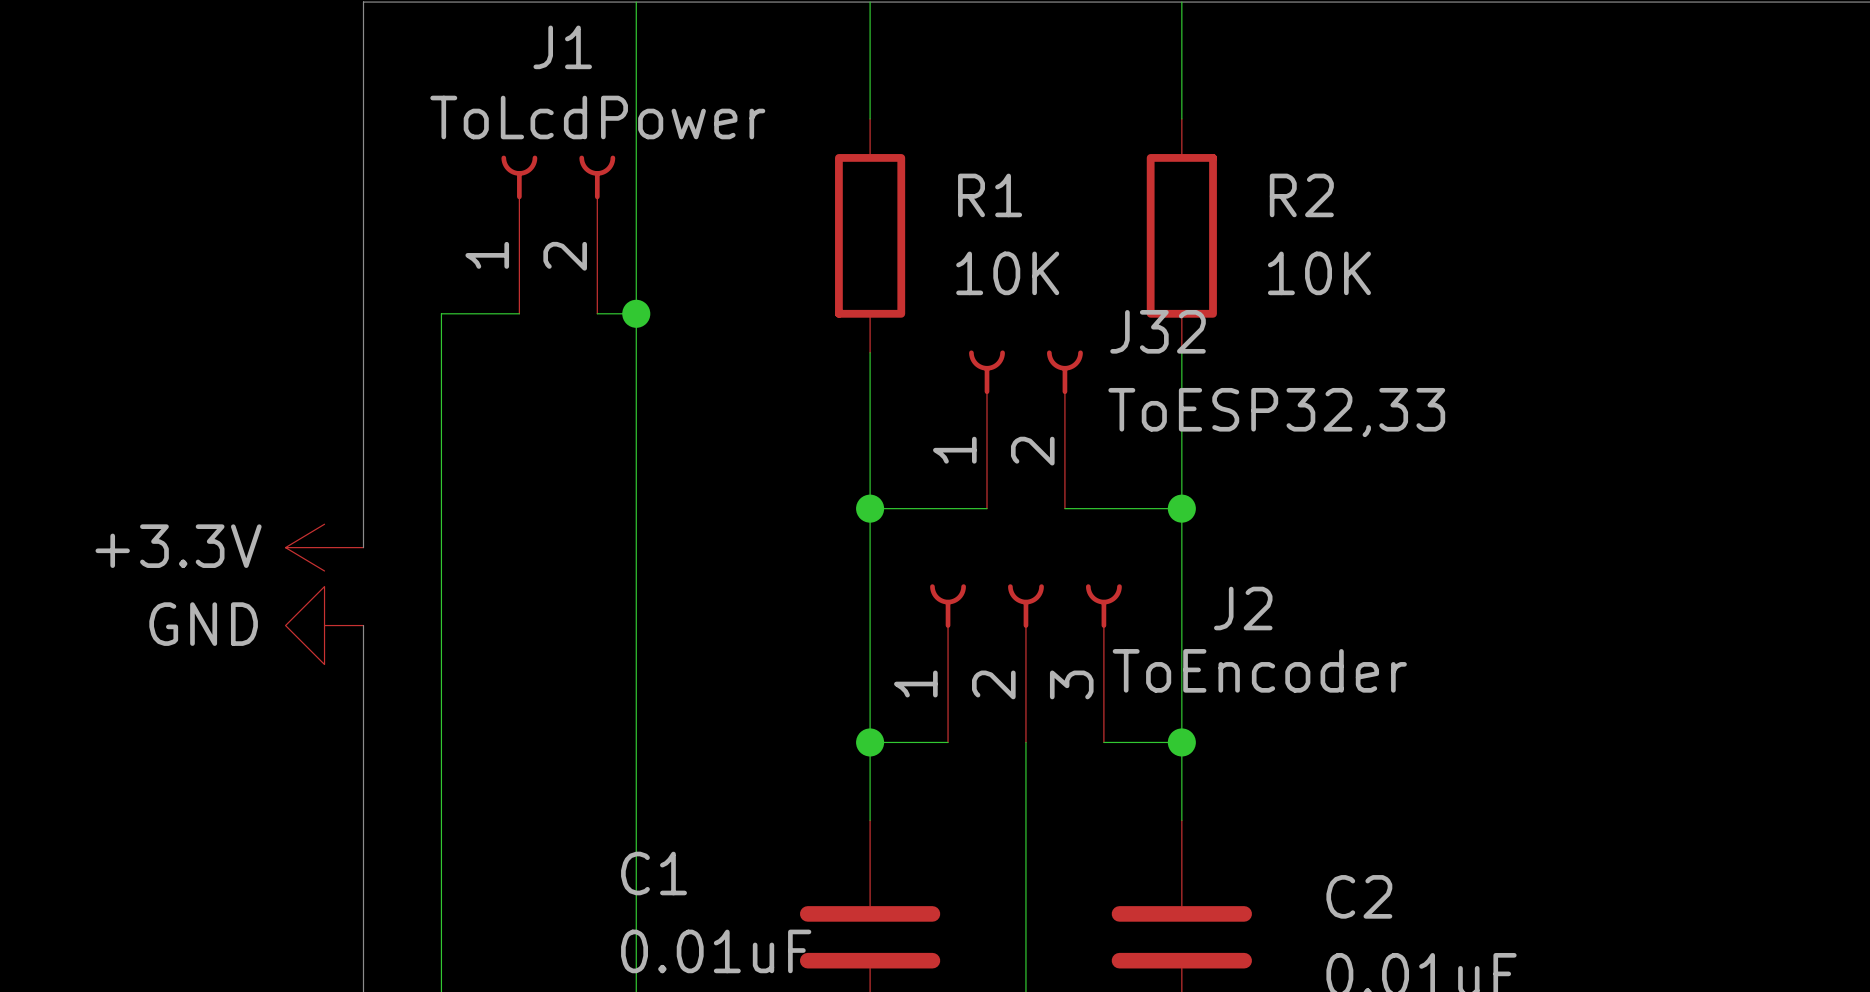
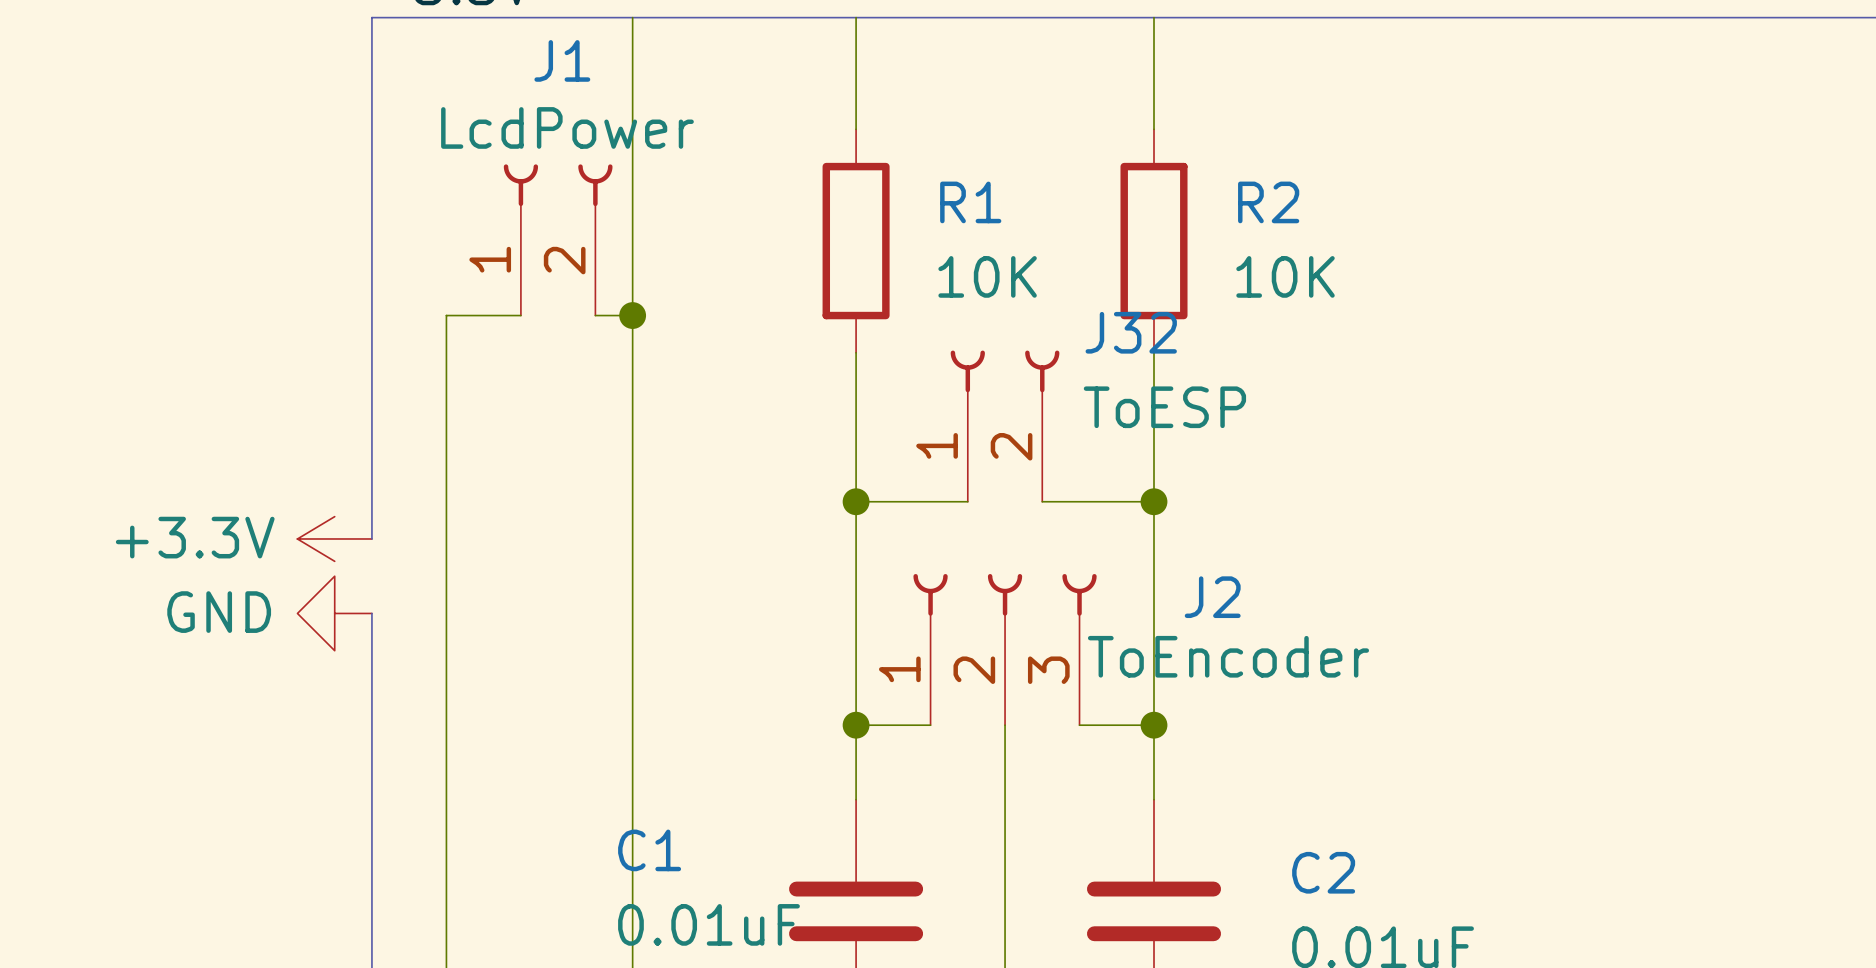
J1 value: ToLcdPower (597, 117) -> LcdPower (567, 127)
J32 value: ToESP32,33 (1276, 412) -> ToESP (1164, 407)

